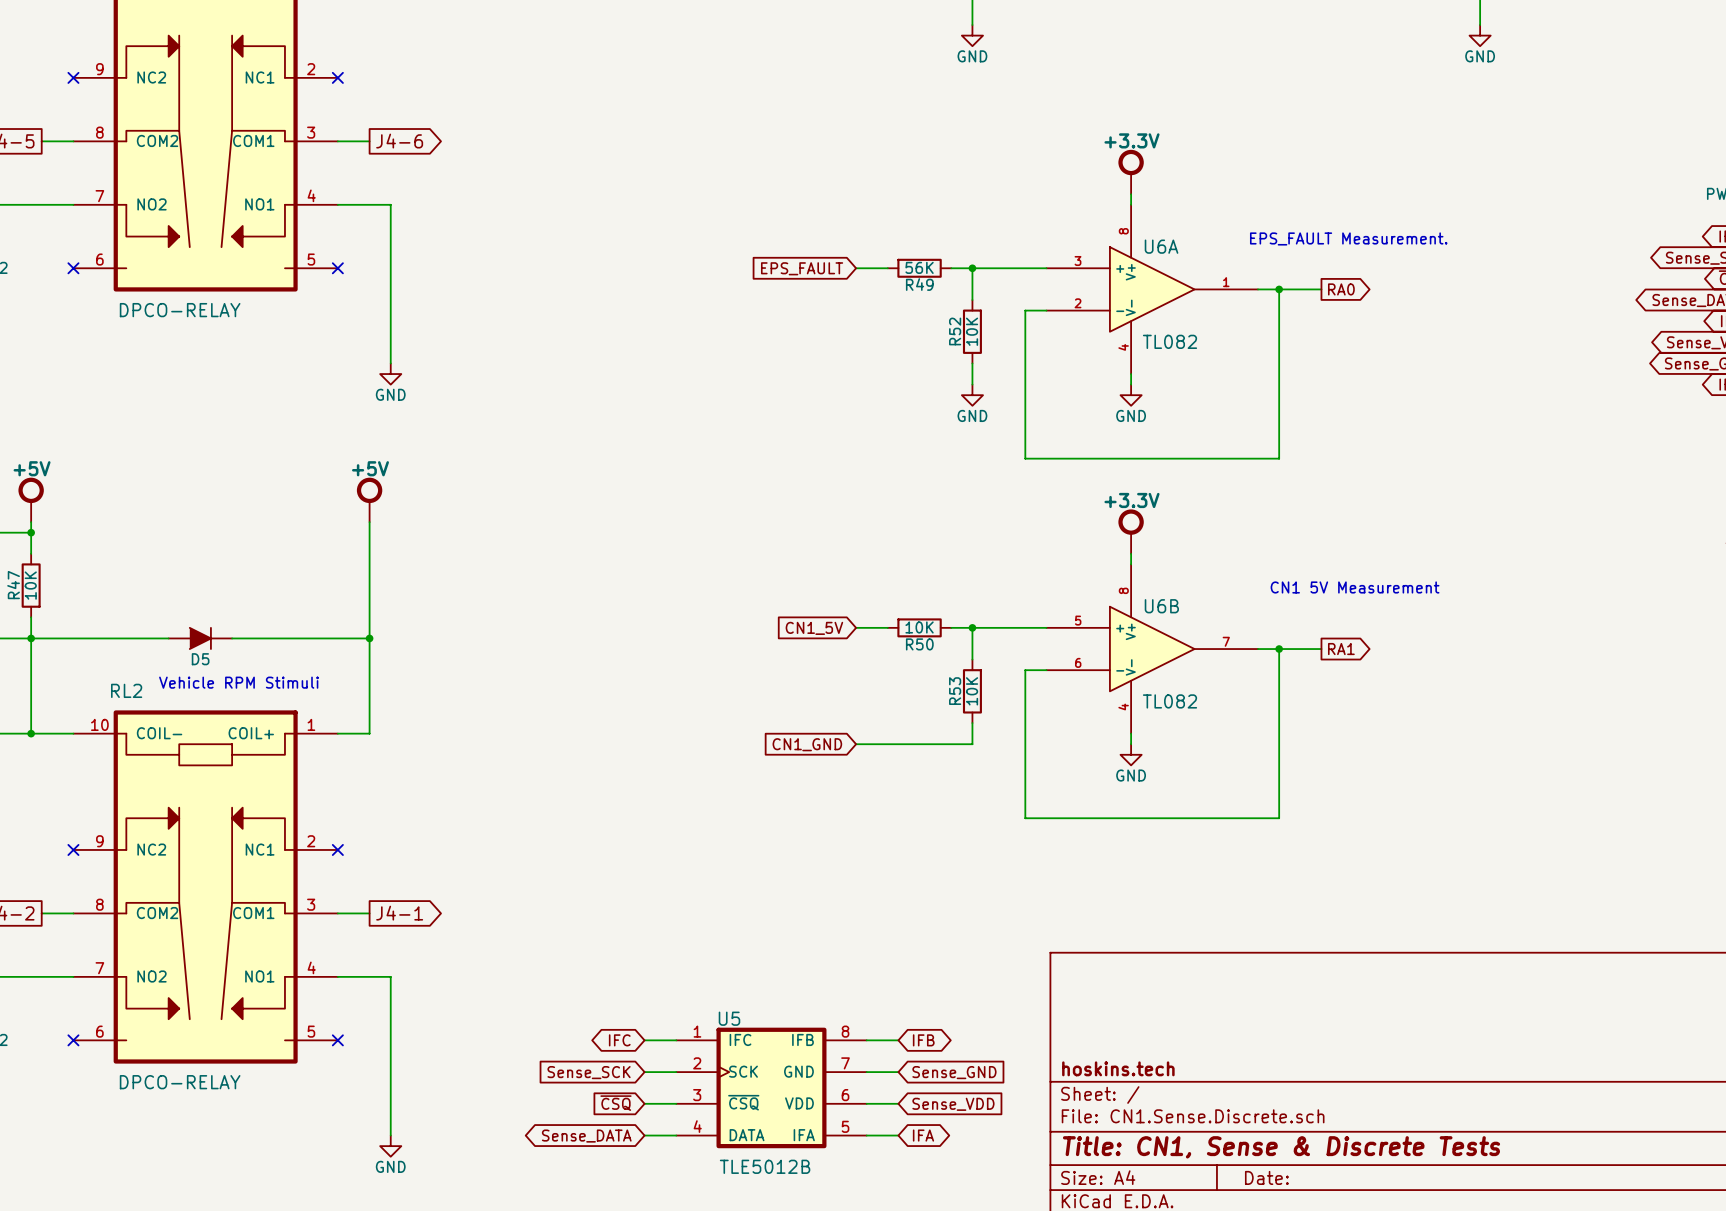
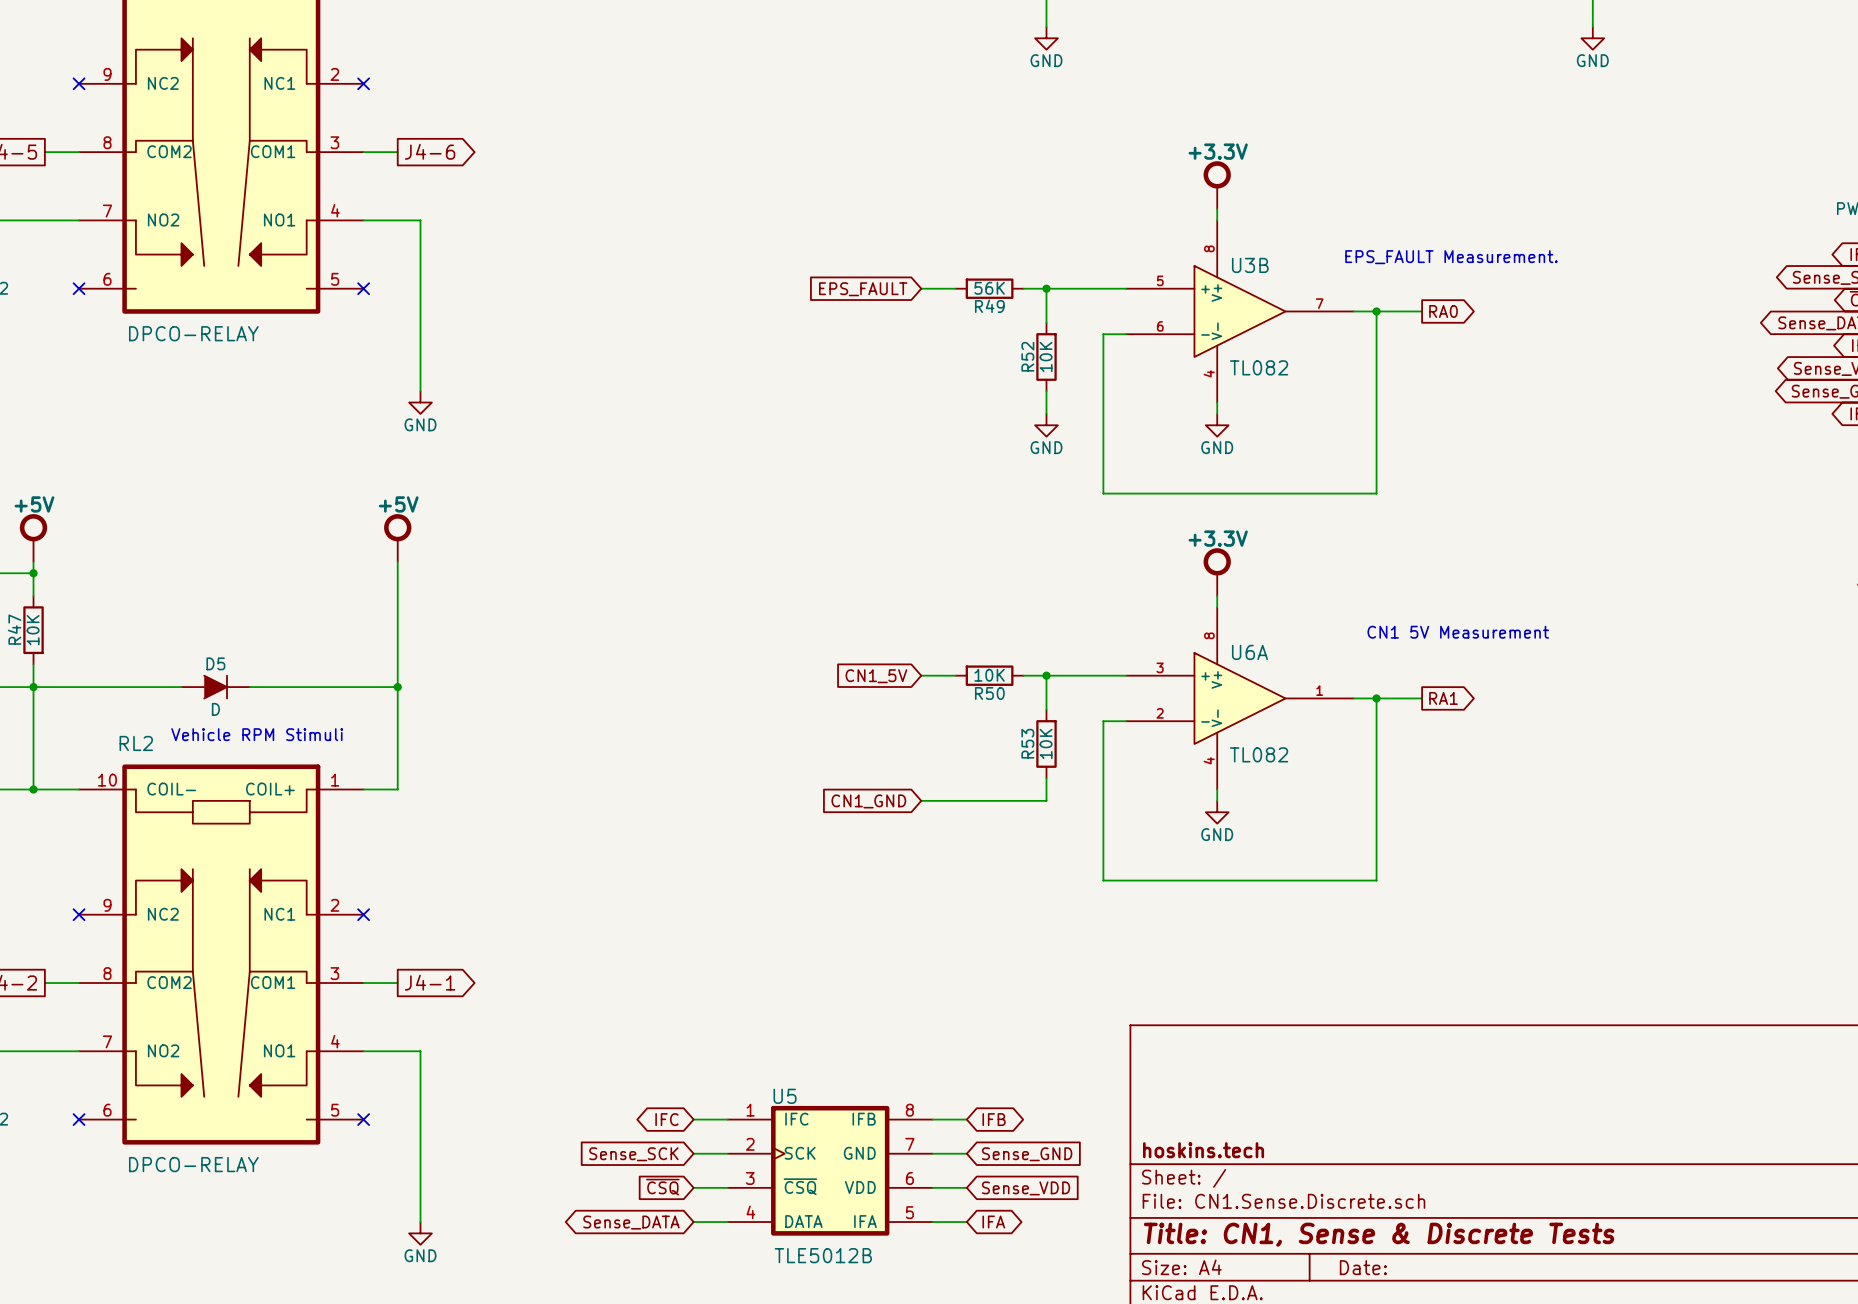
U6A position: (1152, 289) -> (1239, 698)
U3B: none -> TL082 (1239, 311)
U6B: TL082 (1152, 649) -> none
D5 name position: D5 (200, 659) -> D5 (215, 663)
D5 value: none -> D (215, 709)

